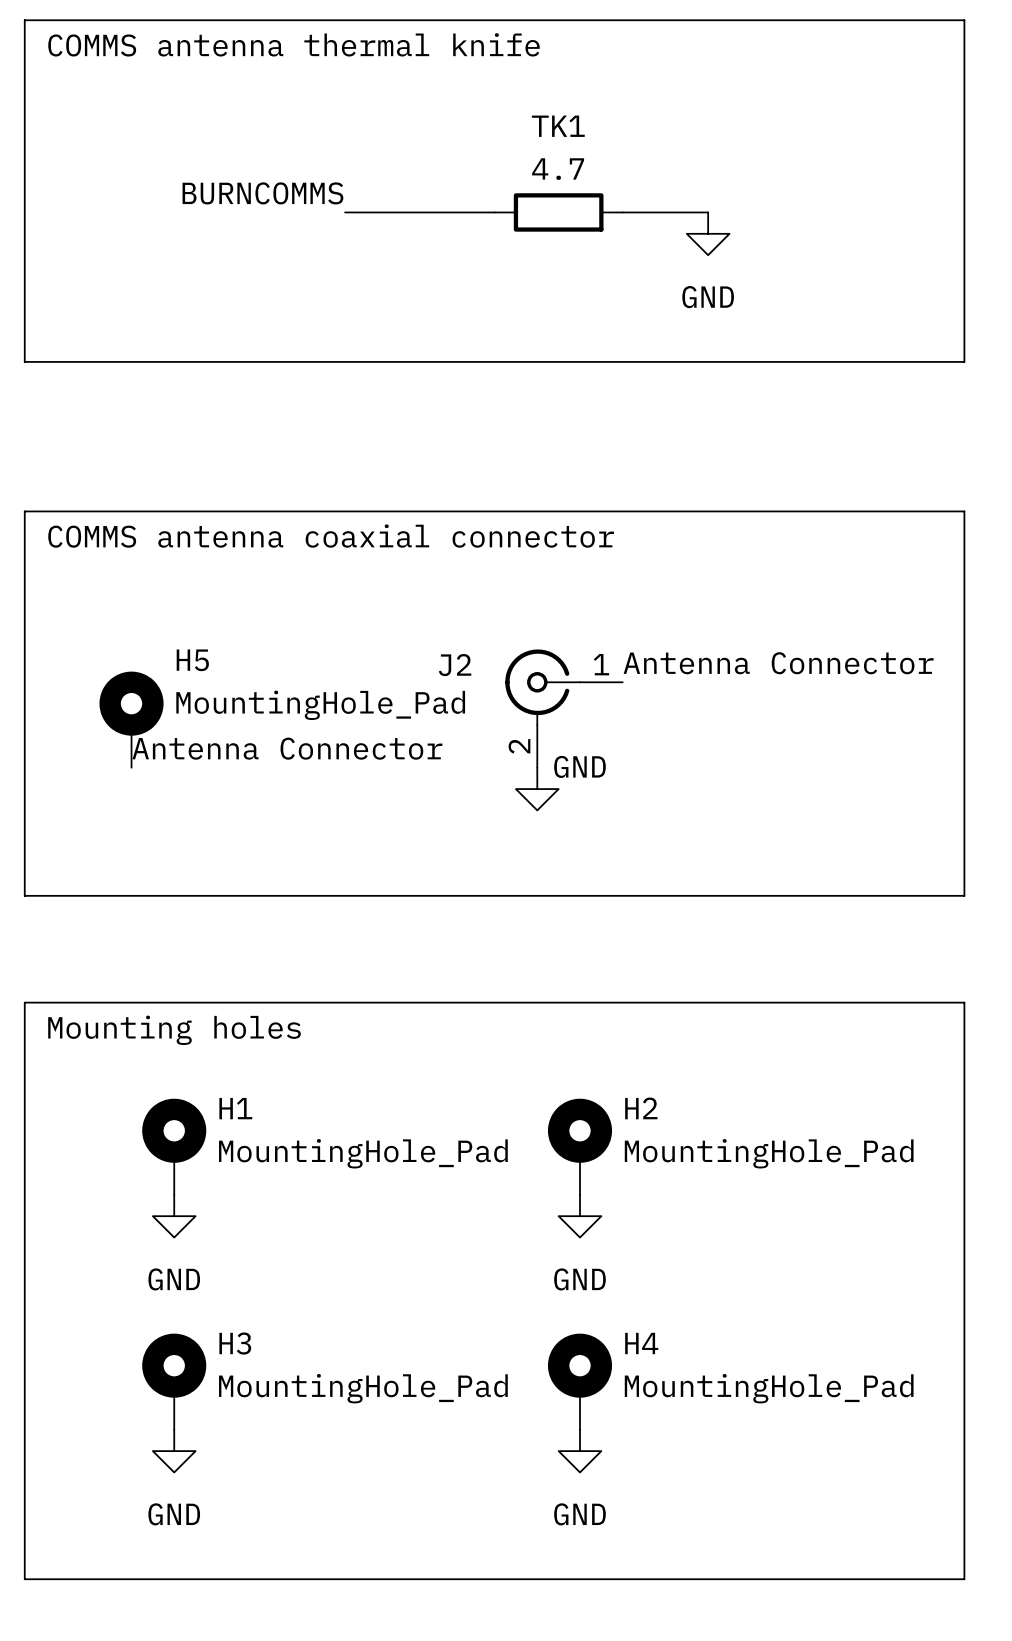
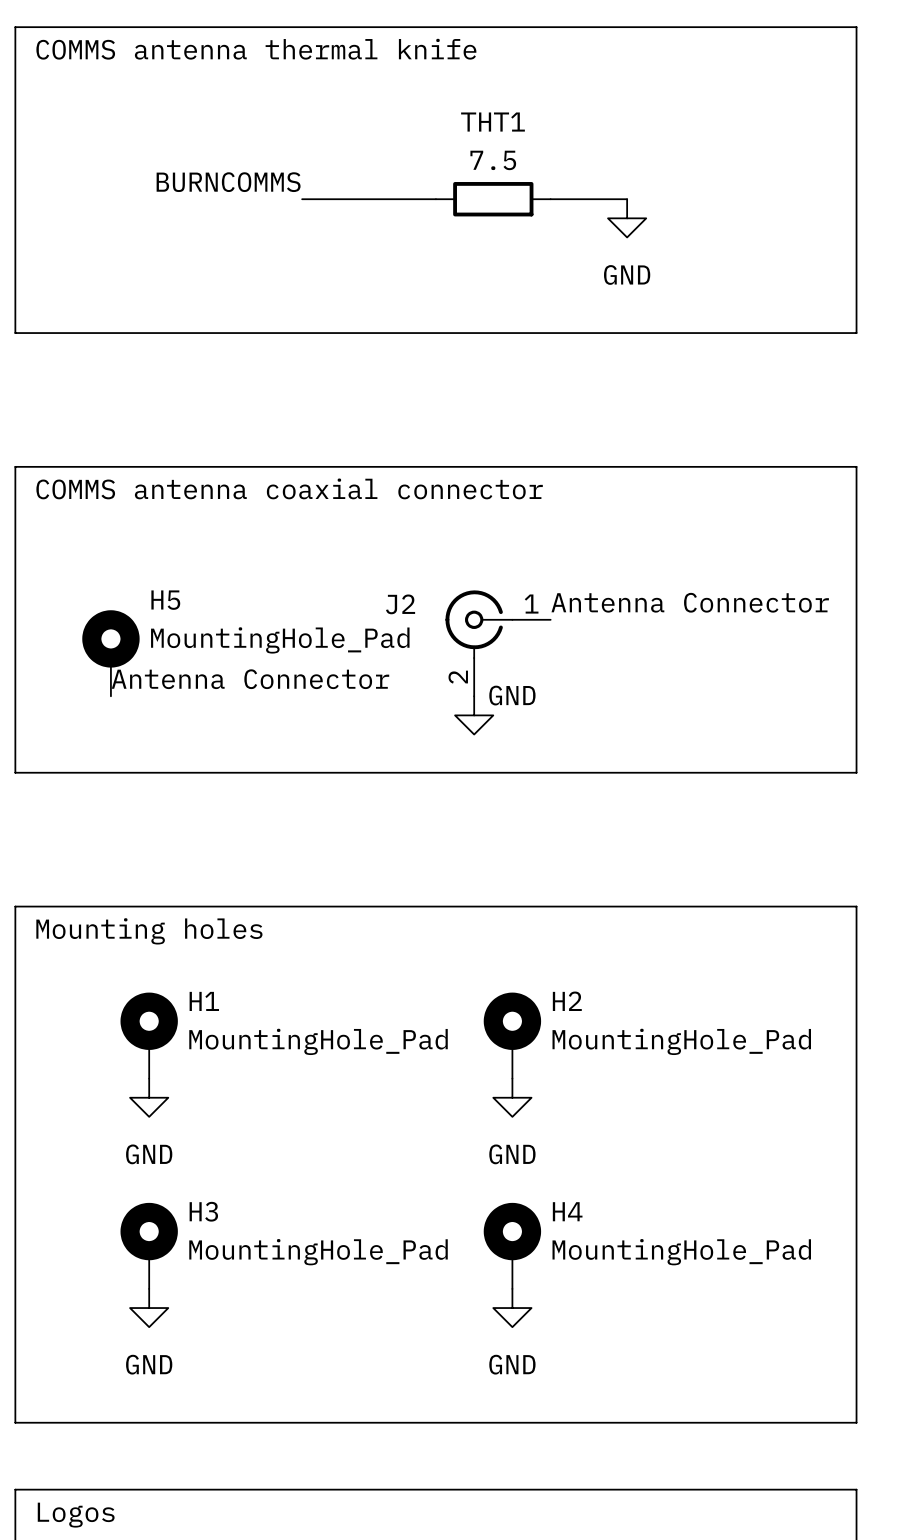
TK1 name: TK1 (558, 126) -> THT1 (493, 122)
TK1 value: 4.7 (558, 169) -> 7.5 (493, 160)
line: (24, 853) (24, 895) (964, 895) (964, 853) -> (15, 772) (856, 772)

